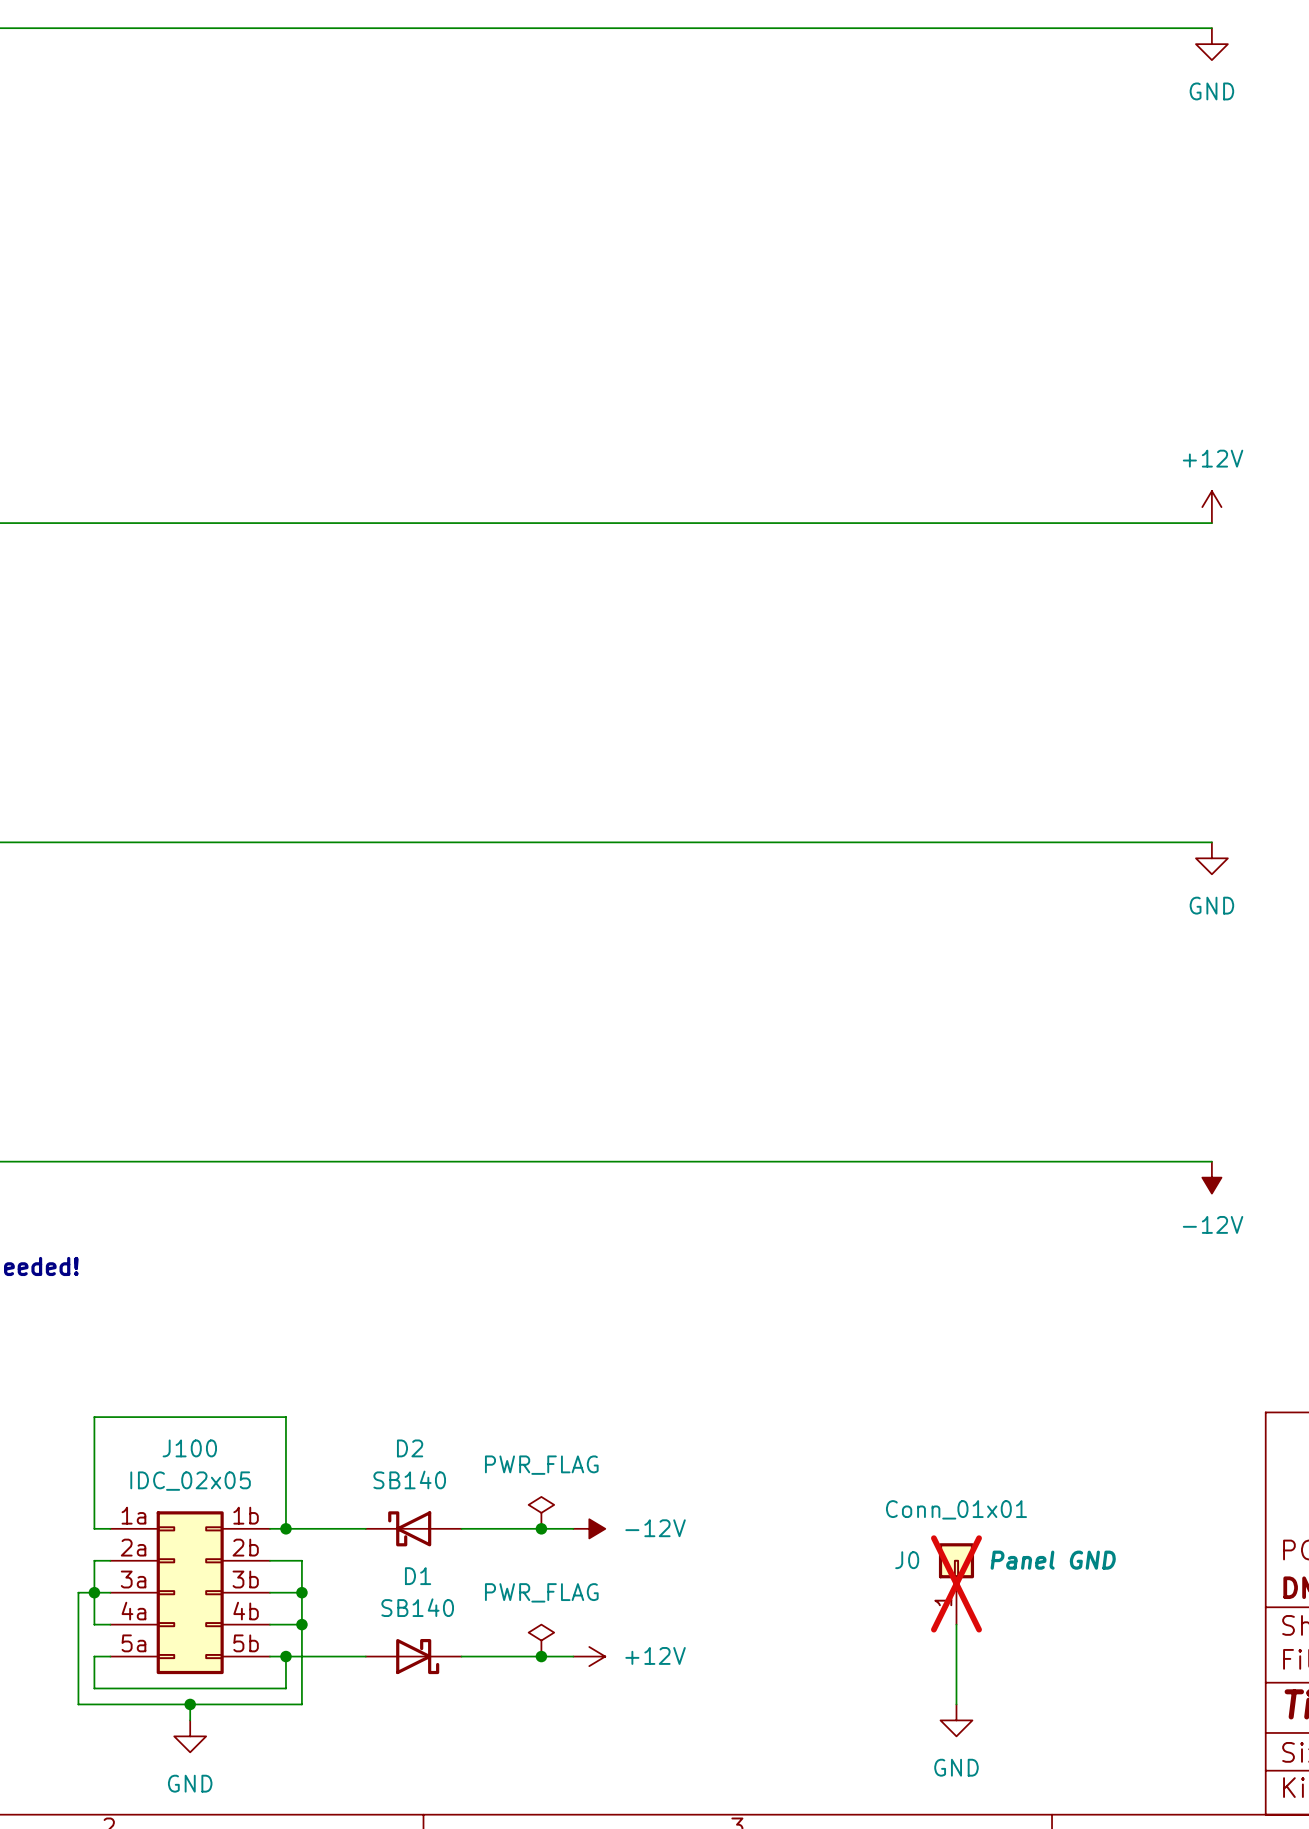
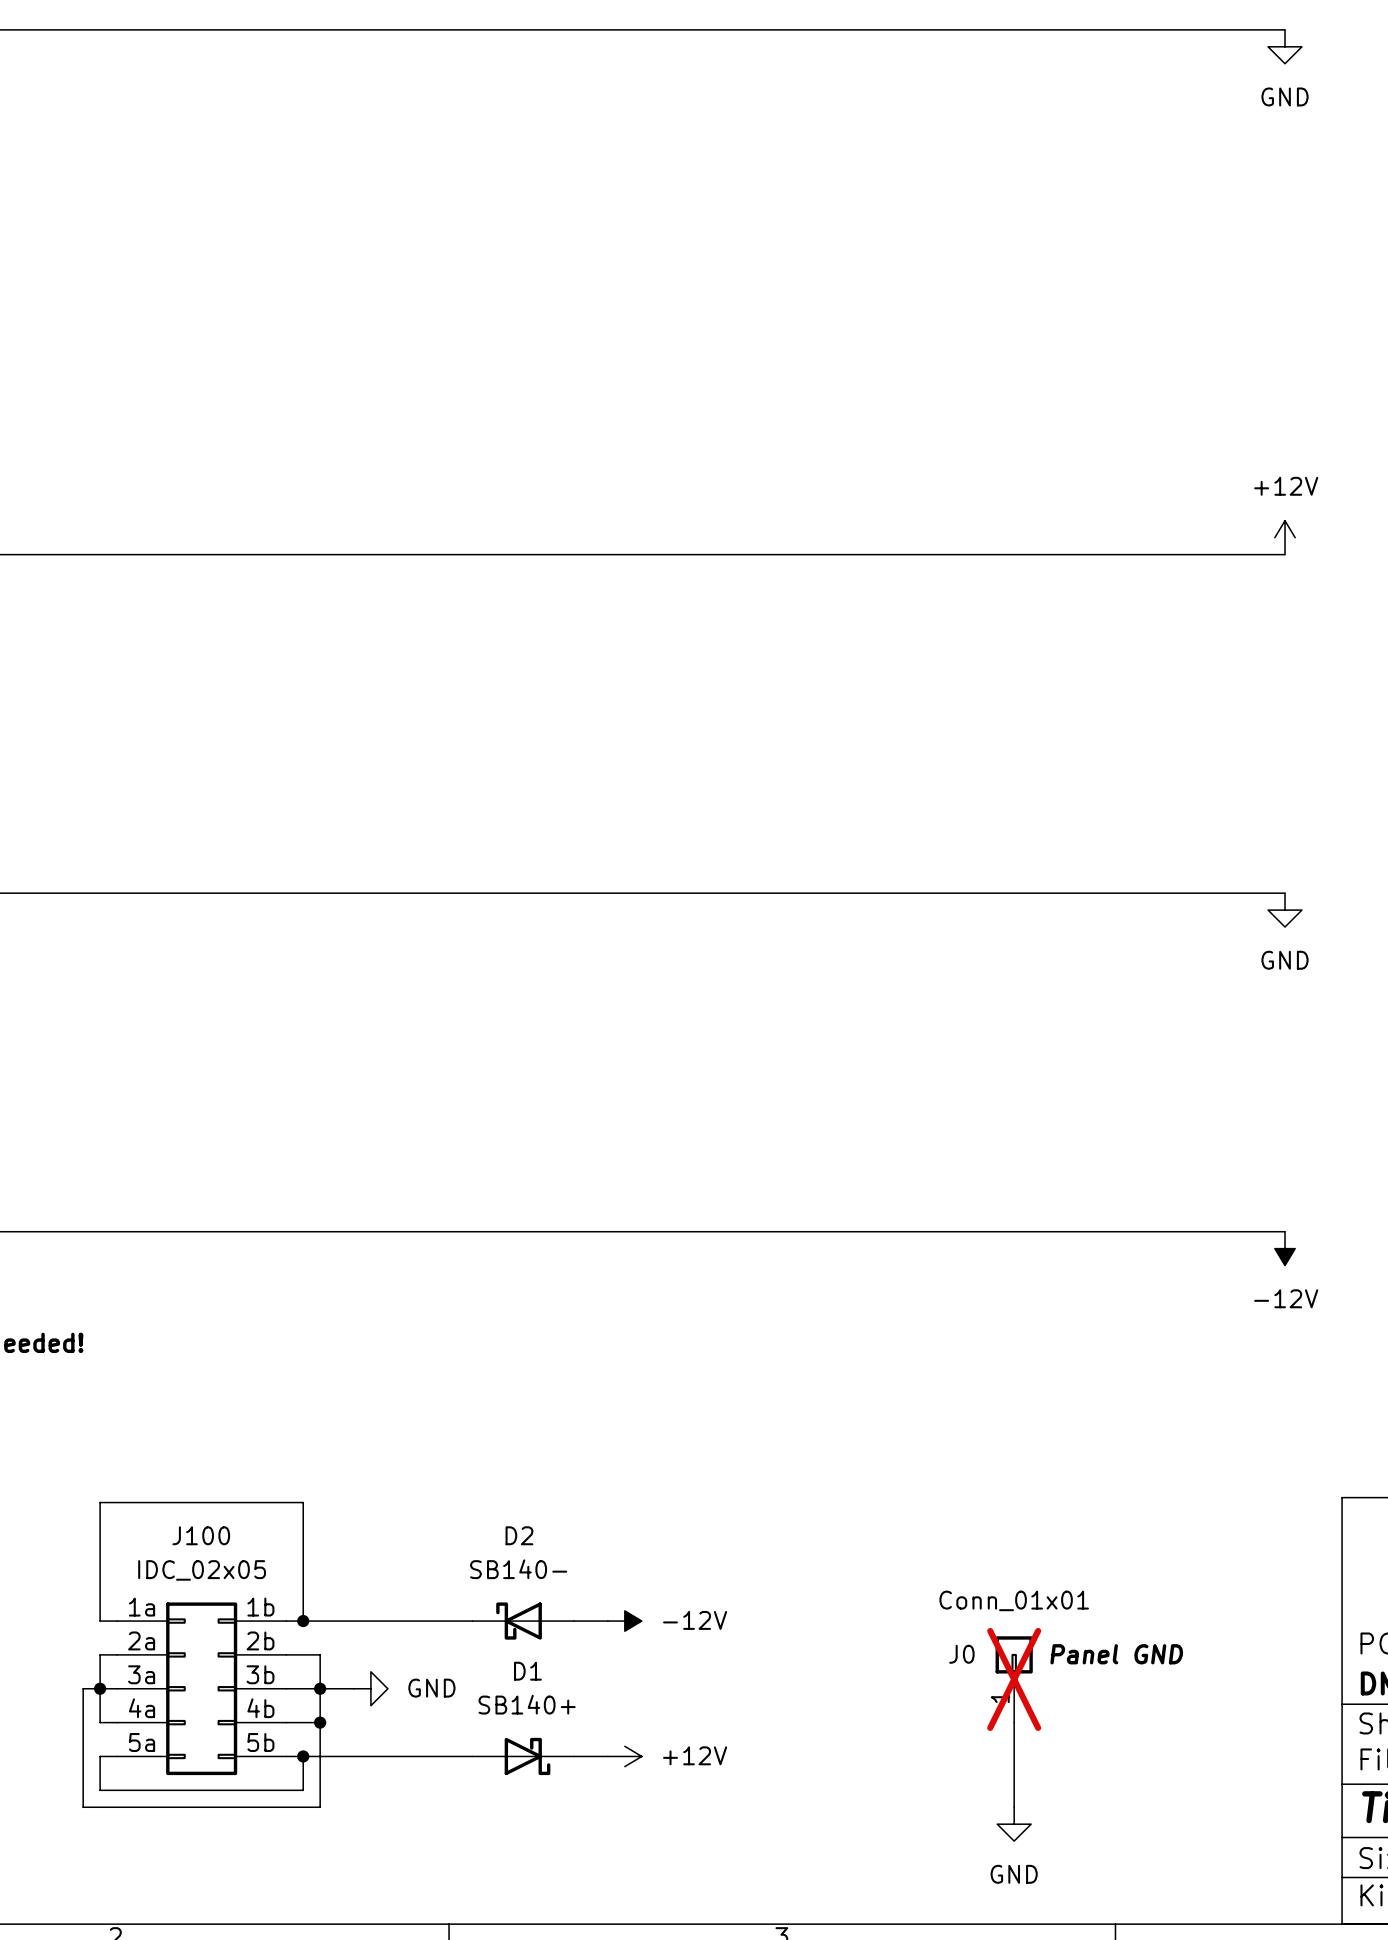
D2 value: SB140 (409, 1479) -> SB140- (518, 1569)
power symbol: PWR_FLAG (541, 1512) -> none
D2 position: (413, 1528) -> (523, 1621)
junction: (541, 1528) -> none
wire: none -> (320, 1688) (354, 1688)
D1 value: SB140 (417, 1607) -> SB140+ (527, 1704)
power symbol: PWR_FLAG (541, 1640) -> none
D1 position: (413, 1656) -> (523, 1756)
junction: (541, 1656) -> none
wire: (190, 1704) (190, 1720) -> none
junction: (190, 1704) -> none
power symbol rotation: 0° (190, 1736) -> 90° counterclockwise (370, 1688)
power symbol position: GND (190, 1736) -> GND (370, 1688)

